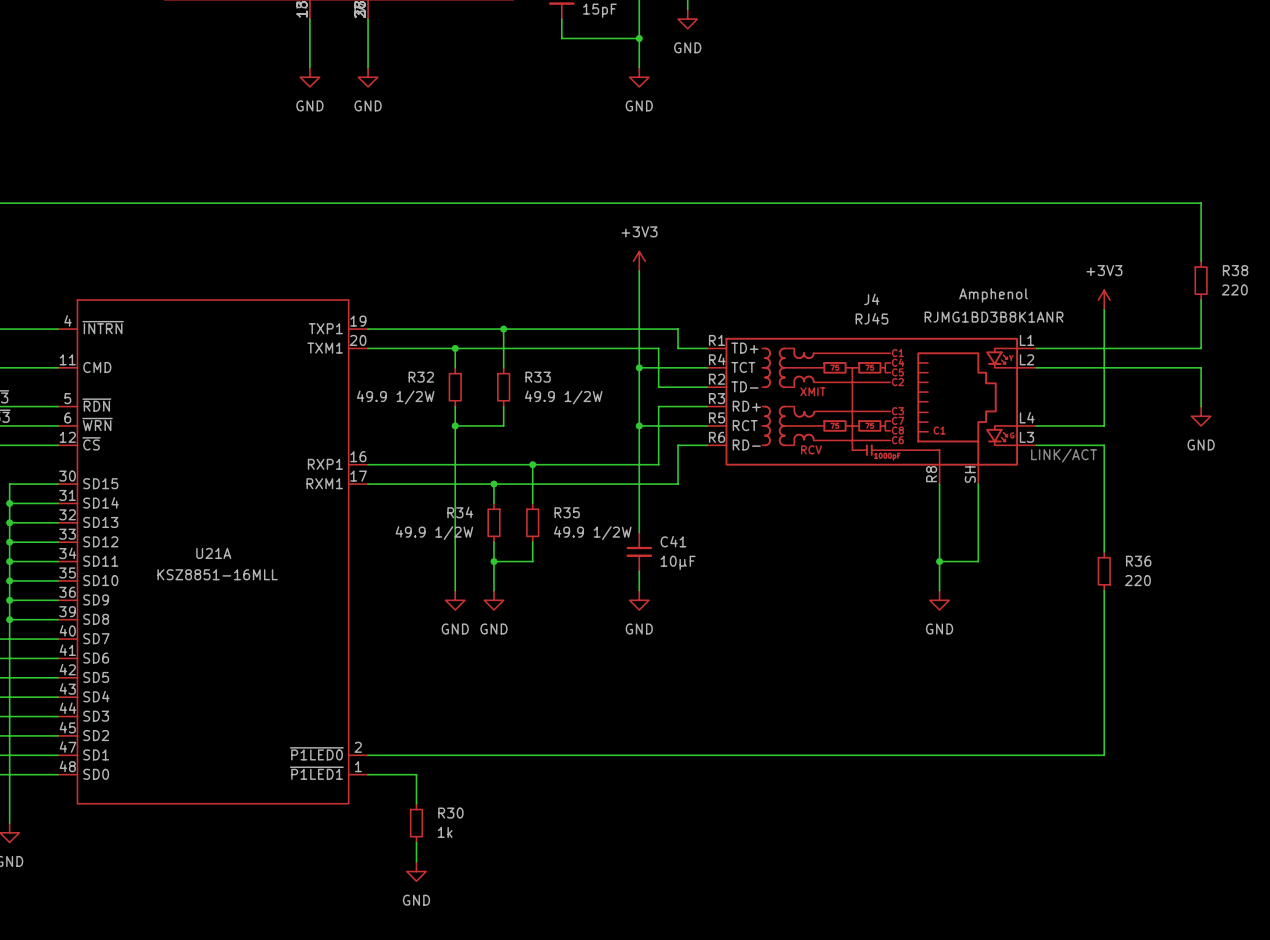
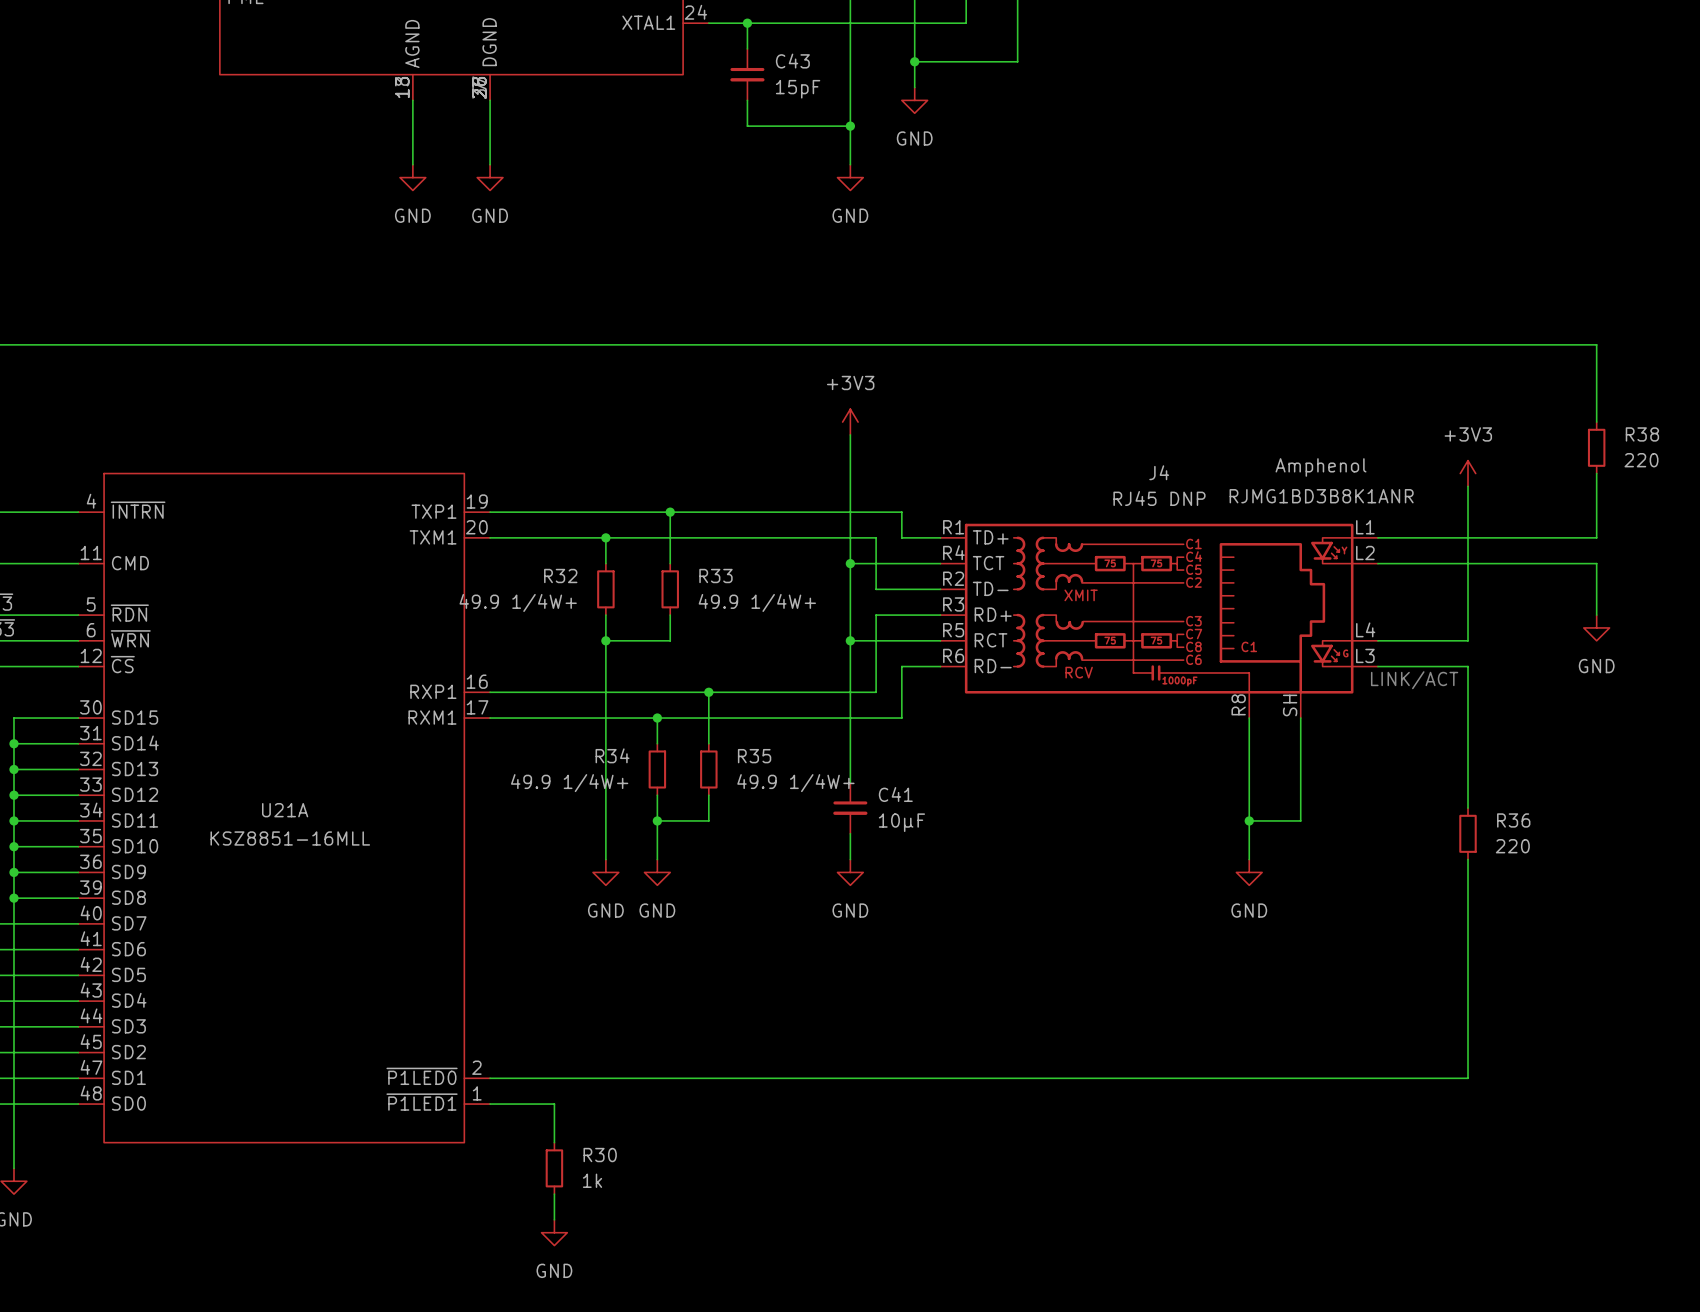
J4 value: RJ45 (871, 318) -> RJ45 DNP (1159, 498)
R32 value: 49.9 1/2W (395, 397) -> 49.9 1/4W+ (518, 602)
R33 value: 49.9 1/2W (563, 397) -> 49.9 1/4W+ (757, 602)
R34 value: 49.9 1/2W (434, 533) -> 49.9 1/4W+ (569, 783)
R35 value: 49.9 1/2W (592, 533) -> 49.9 1/4W+ (795, 783)

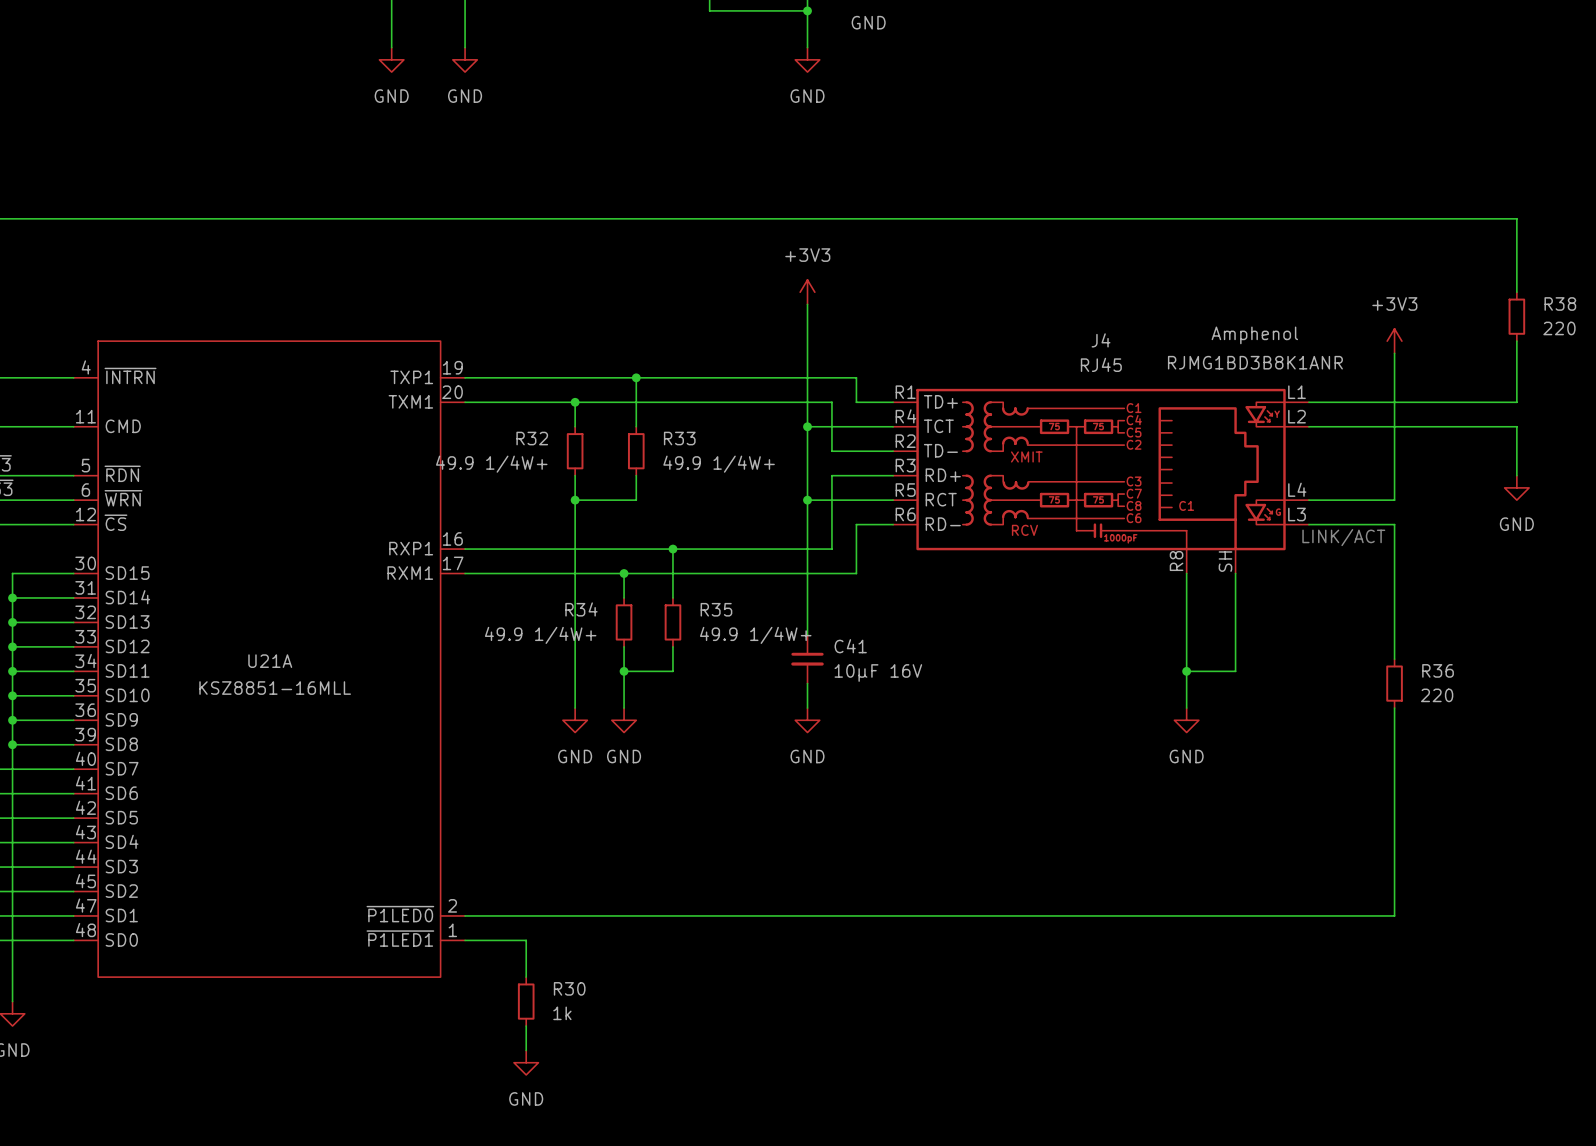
J4 value: RJ45 DNP (1159, 498) -> RJ45 (1101, 364)
C41 value: 10µF (901, 822) -> 10µF 16V (878, 673)

